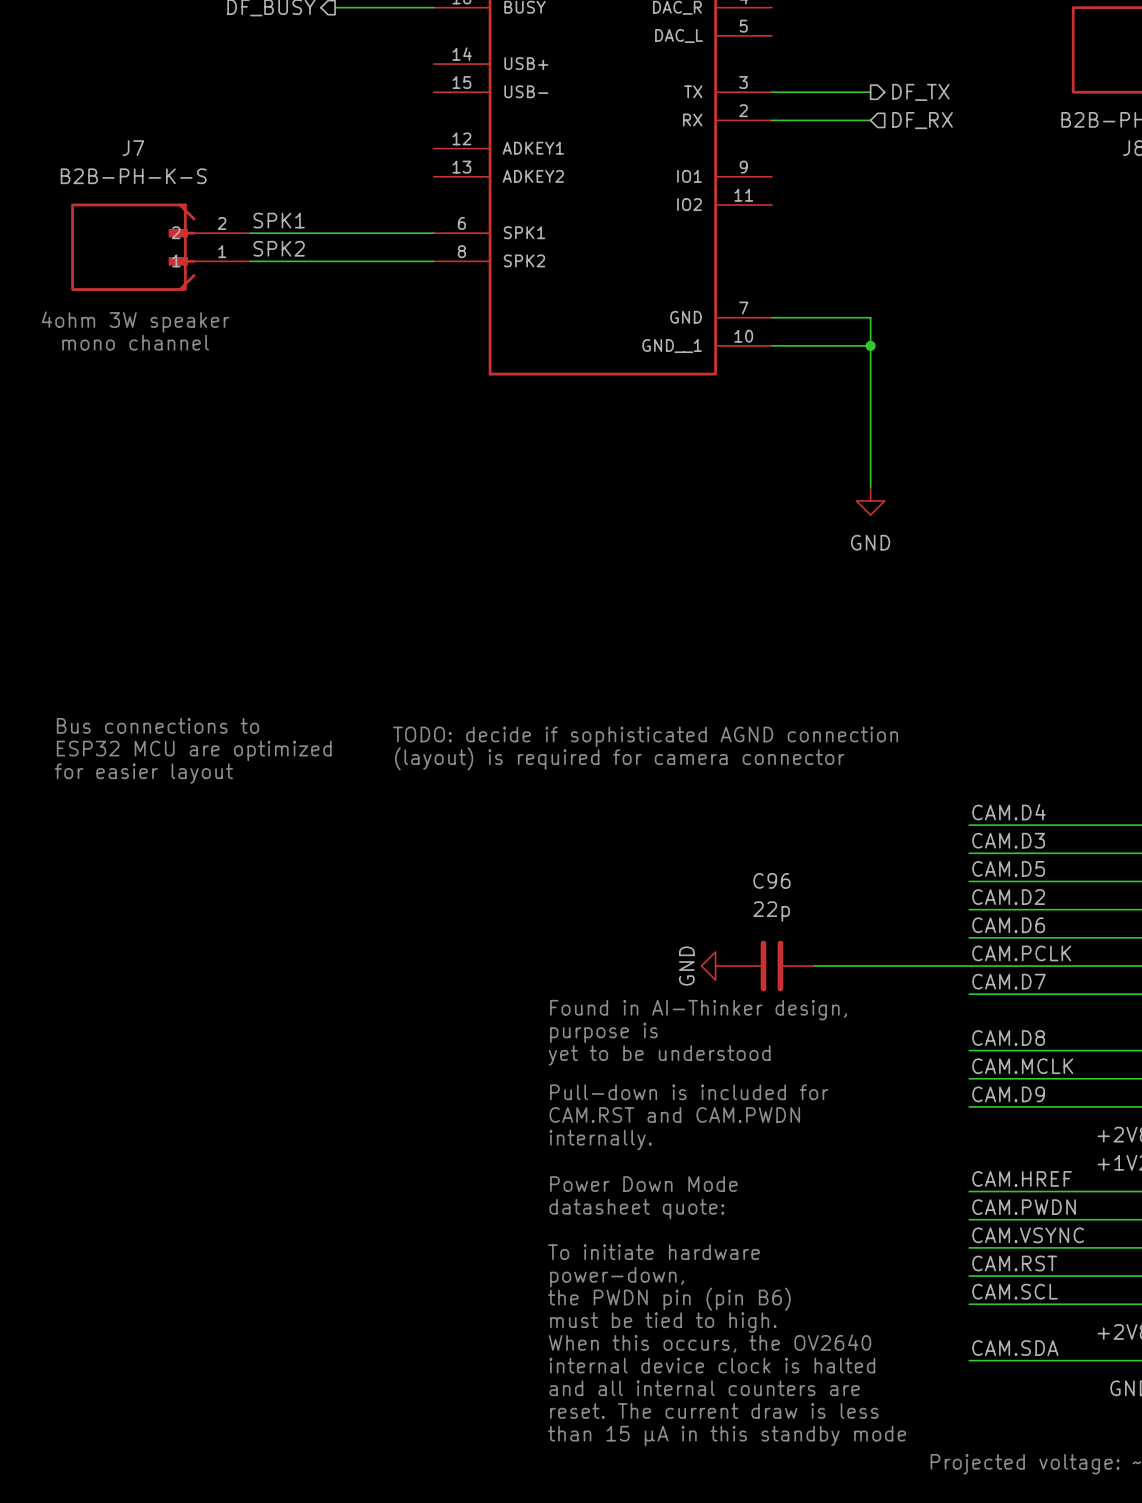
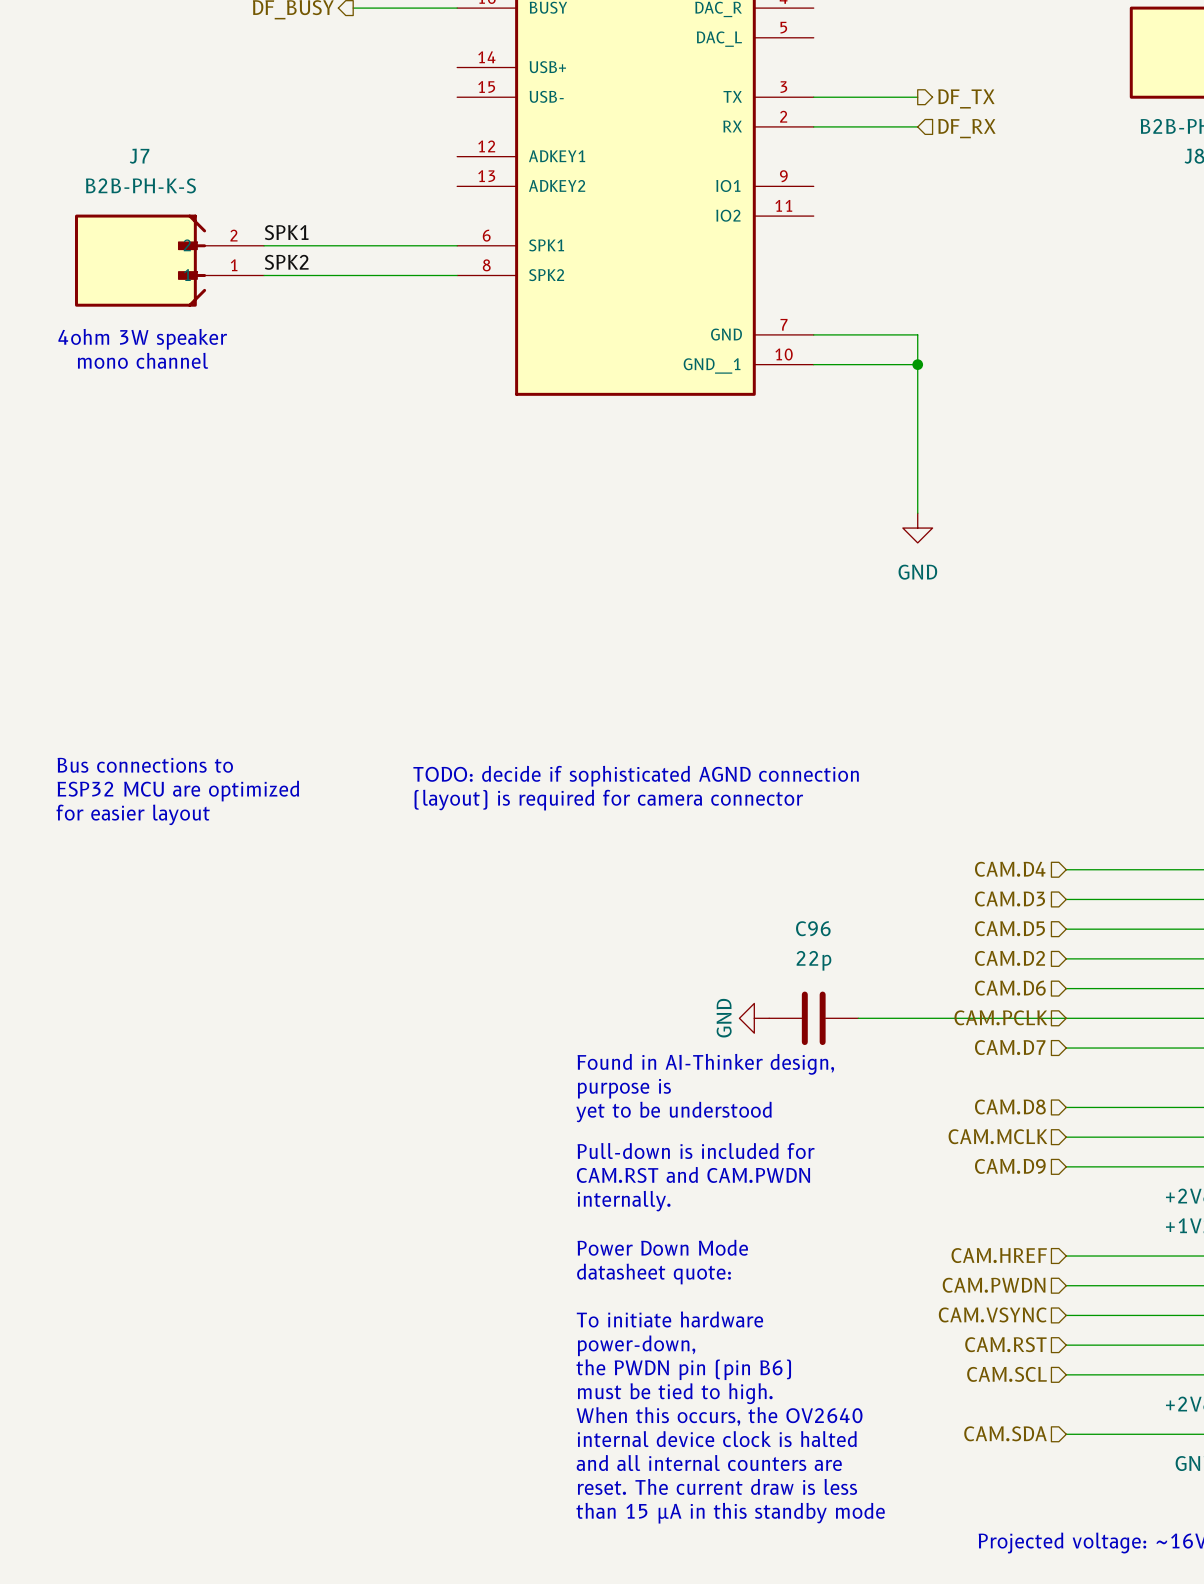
label: CAM.D4 (1008, 812) -> none
hierarchical label: none -> CAM.D4 (1010, 869)
wire: (969, 825) (1011, 825) -> none
label: CAM.D3 (1008, 840) -> none
hierarchical label: none -> CAM.D3 (1010, 898)
wire: (969, 853) (1011, 853) -> none
label: CAM.D5 (1008, 868) -> none
hierarchical label: none -> CAM.D5 (1009, 928)
wire: (969, 881) (1011, 881) -> none
label: CAM.D2 (1008, 897) -> none
hierarchical label: none -> CAM.D2 (1010, 958)
wire: (969, 909) (1011, 909) -> none
label: CAM.D6 (1008, 925) -> none
hierarchical label: none -> CAM.D6 (1010, 988)
wire: (969, 937) (1011, 937) -> none
label: CAM.PCLK (1021, 953) -> none
hierarchical label: none -> CAM.PCLK (1000, 1017)
label: CAM.D7 (1008, 981) -> none
hierarchical label: none -> CAM.D7 (1010, 1047)
wire: (969, 994) (1011, 994) -> none
label: CAM.D8 (1008, 1038) -> none
hierarchical label: none -> CAM.D8 (1010, 1106)
wire: (969, 1050) (1011, 1050) -> none
label: CAM.MCLK (1022, 1066) -> none
hierarchical label: none -> CAM.MCLK (997, 1136)
wire: (969, 1078) (1011, 1078) -> none
label: CAM.D9 (1008, 1094) -> none
hierarchical label: none -> CAM.D9 (1010, 1166)
wire: (969, 1106) (1011, 1106) -> none
label: CAM.HREF (1022, 1178) -> none
hierarchical label: none -> CAM.HREF (999, 1255)
wire: (969, 1191) (1011, 1191) -> none
label: CAM.PWDN (1024, 1207) -> none
hierarchical label: none -> CAM.PWDN (994, 1285)
wire: (969, 1219) (1011, 1219) -> none
label: CAM.VSYNC (1028, 1235) -> none
hierarchical label: none -> CAM.VSYNC (992, 1314)
wire: (969, 1247) (1011, 1247) -> none
label: CAM.RST (1014, 1263) -> none
hierarchical label: none -> CAM.RST (1005, 1344)
wire: (969, 1276) (1011, 1276) -> none
label: CAM.SCL (1015, 1291) -> none
hierarchical label: none -> CAM.SCL (1007, 1374)
wire: (969, 1304) (1011, 1304) -> none
label: CAM.SDA (1015, 1348) -> none
hierarchical label: none -> CAM.SDA (1005, 1433)
wire: (969, 1360) (1011, 1360) -> none

